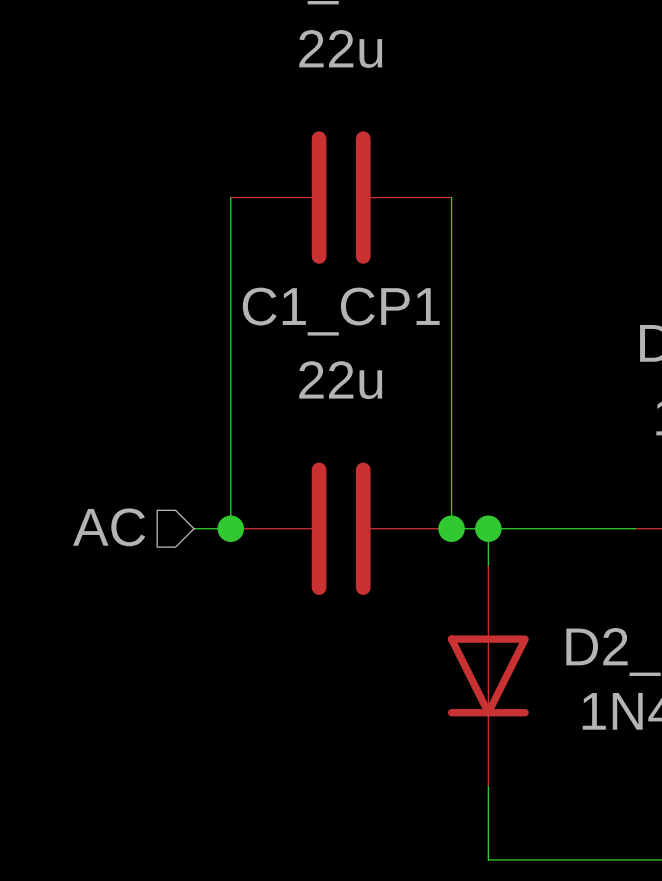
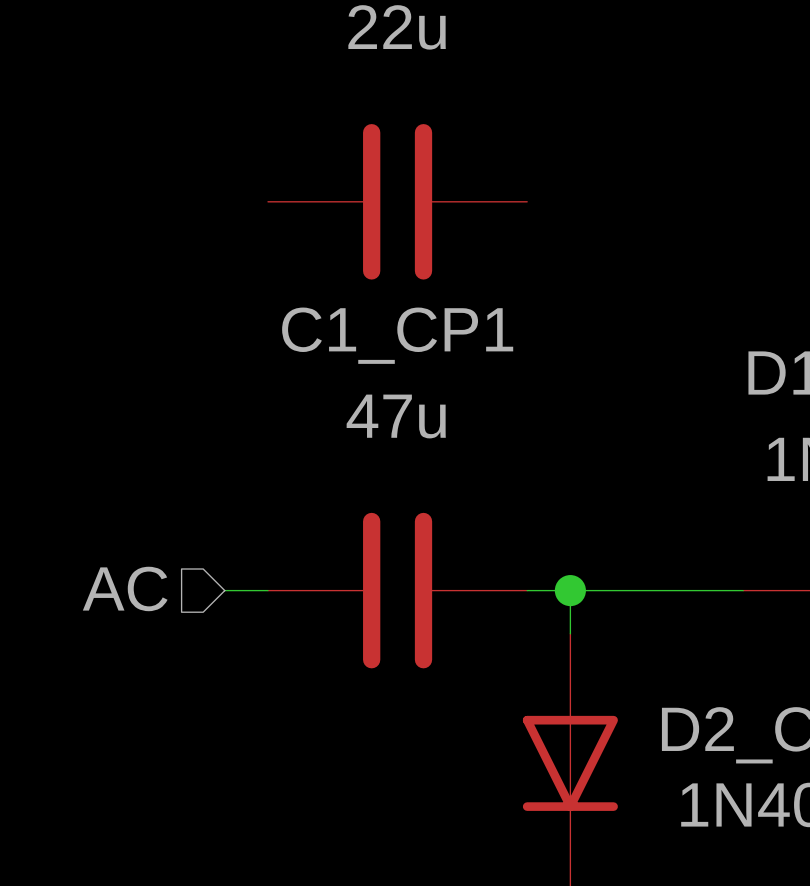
wire: (230, 197) (230, 528) -> none
wire: (451, 197) (451, 528) -> none
C1_CP1 value: 22u (340, 380) -> 47u (396, 416)
junction: (230, 528) -> none
junction: (451, 528) -> none

